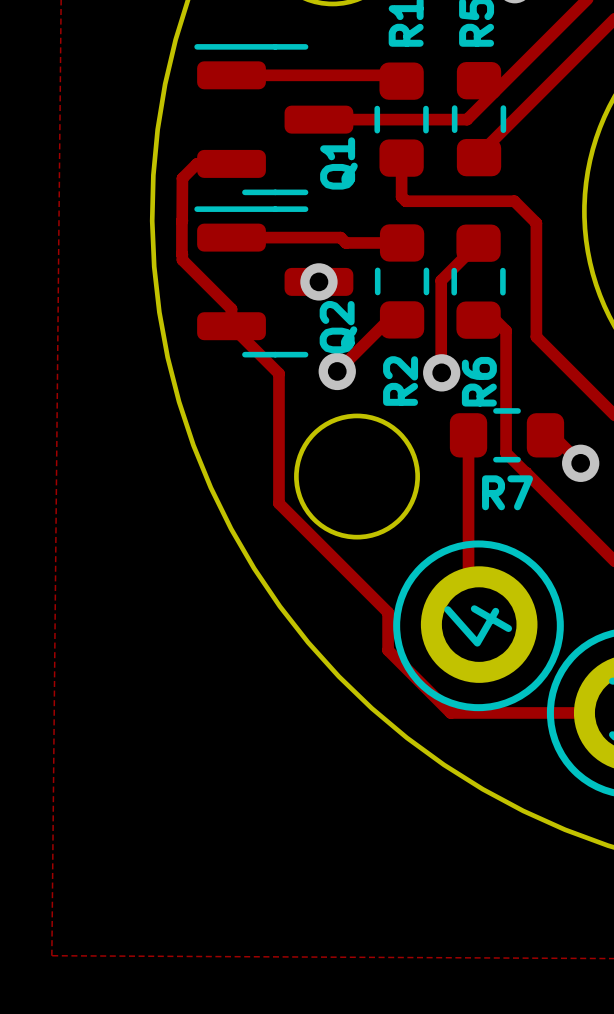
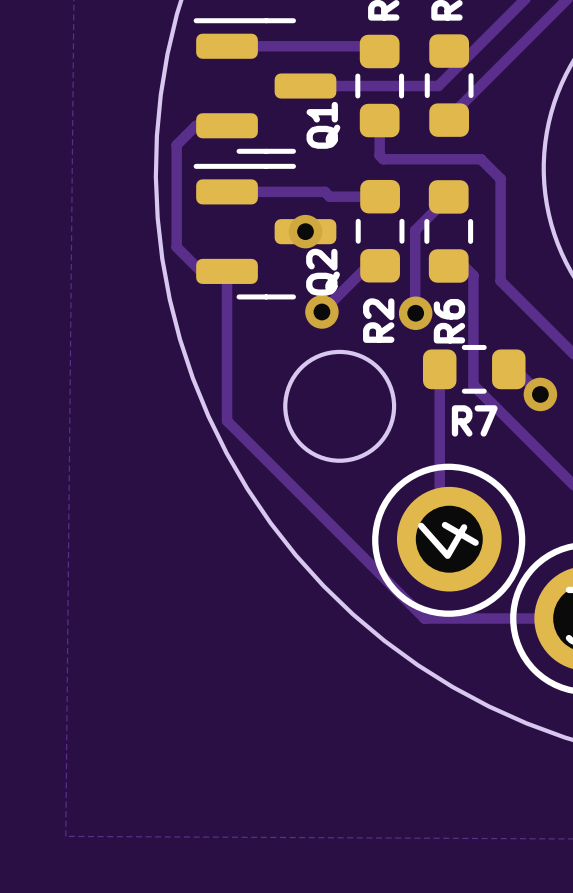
track: (182, 178) (182, 220) -> none
track: (181, 221) (181, 253) -> none
track: (182, 254) (182, 259) (231, 309) (231, 326) (278, 373) (278, 503) (388, 612) (388, 650) (450, 712) -> (182, 138) (176, 145) (176, 247) (200, 271) (227, 271) (227, 420) (424, 618)

